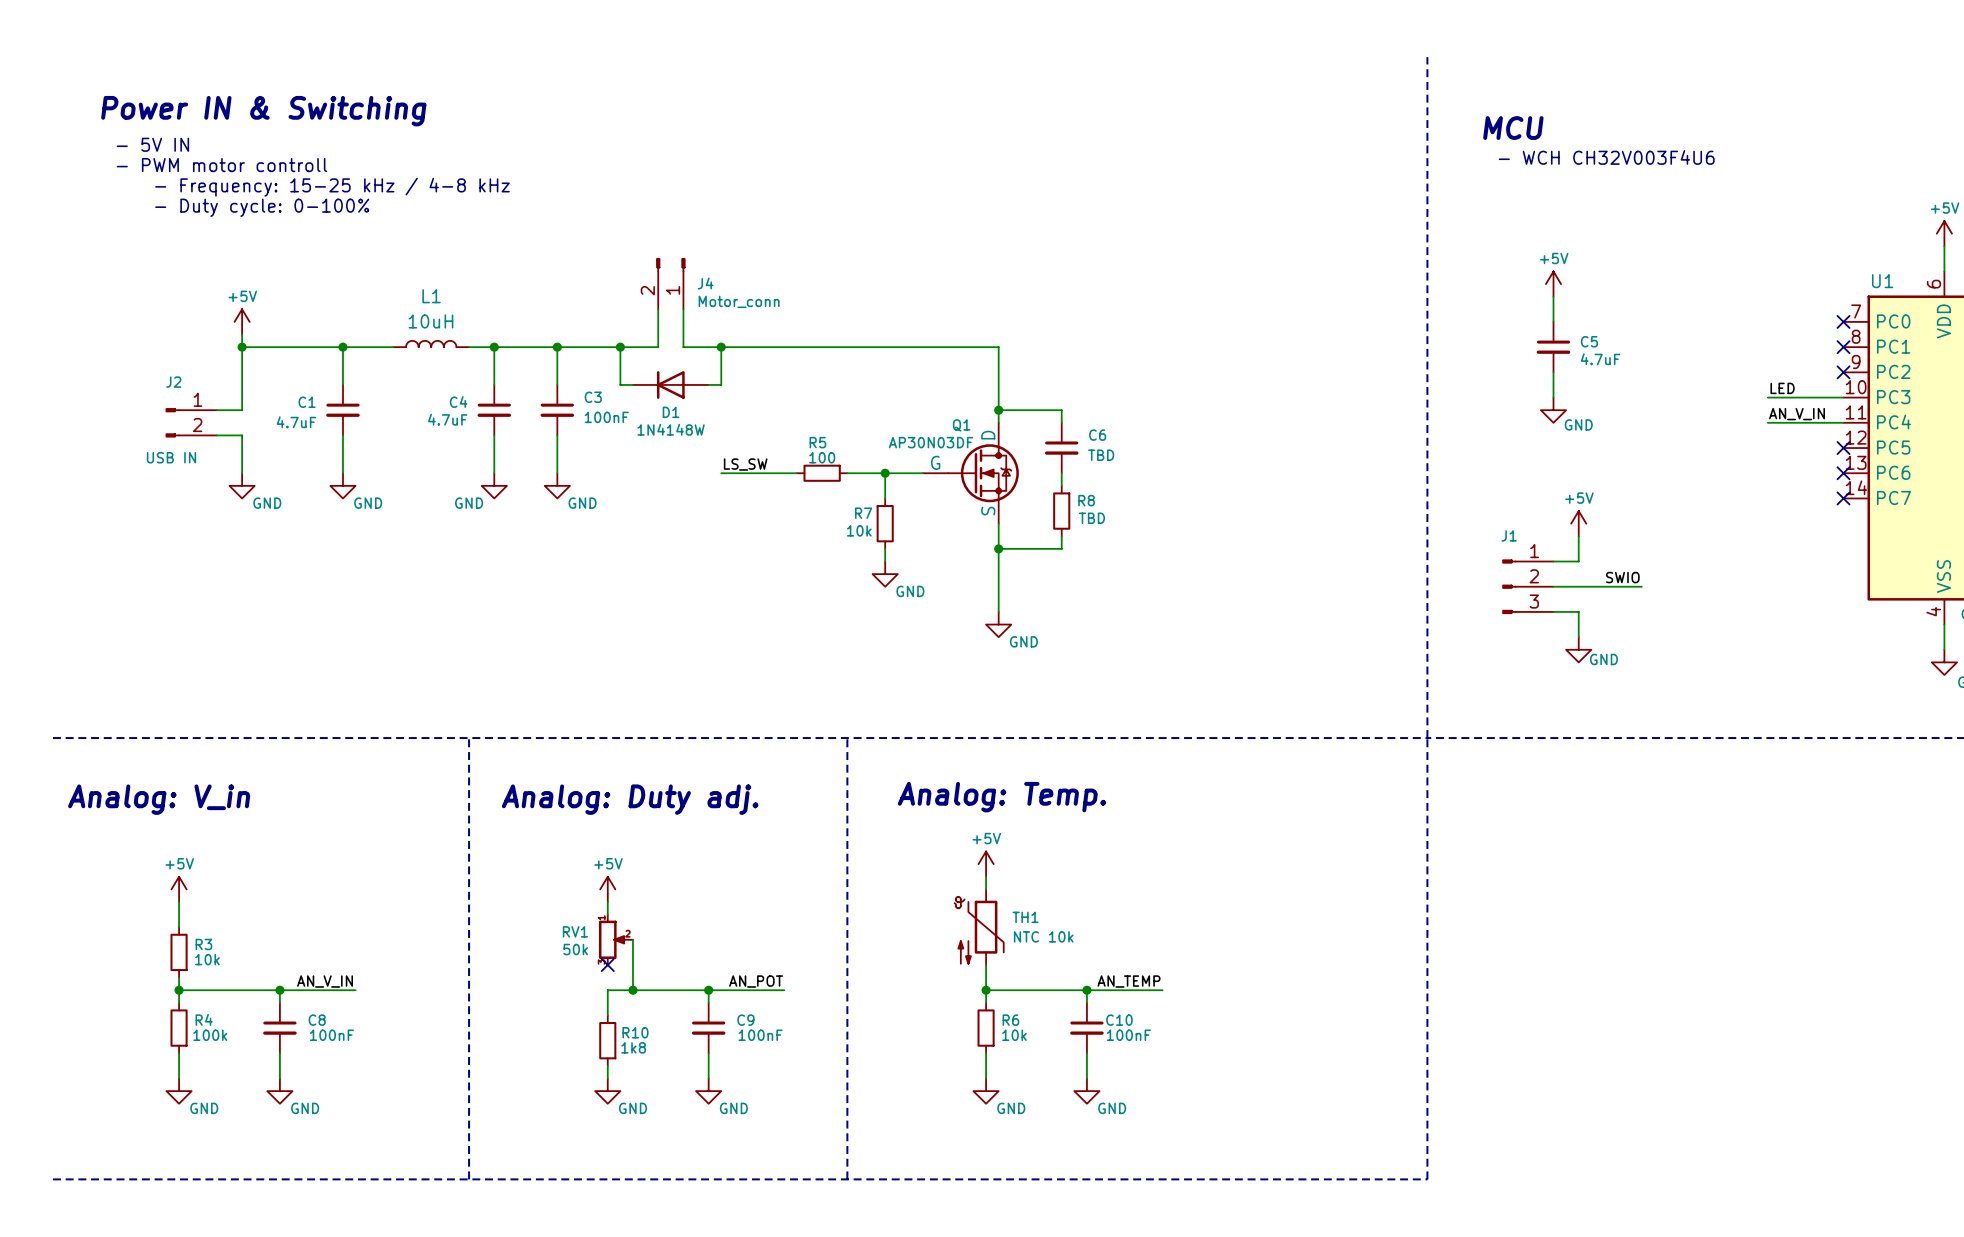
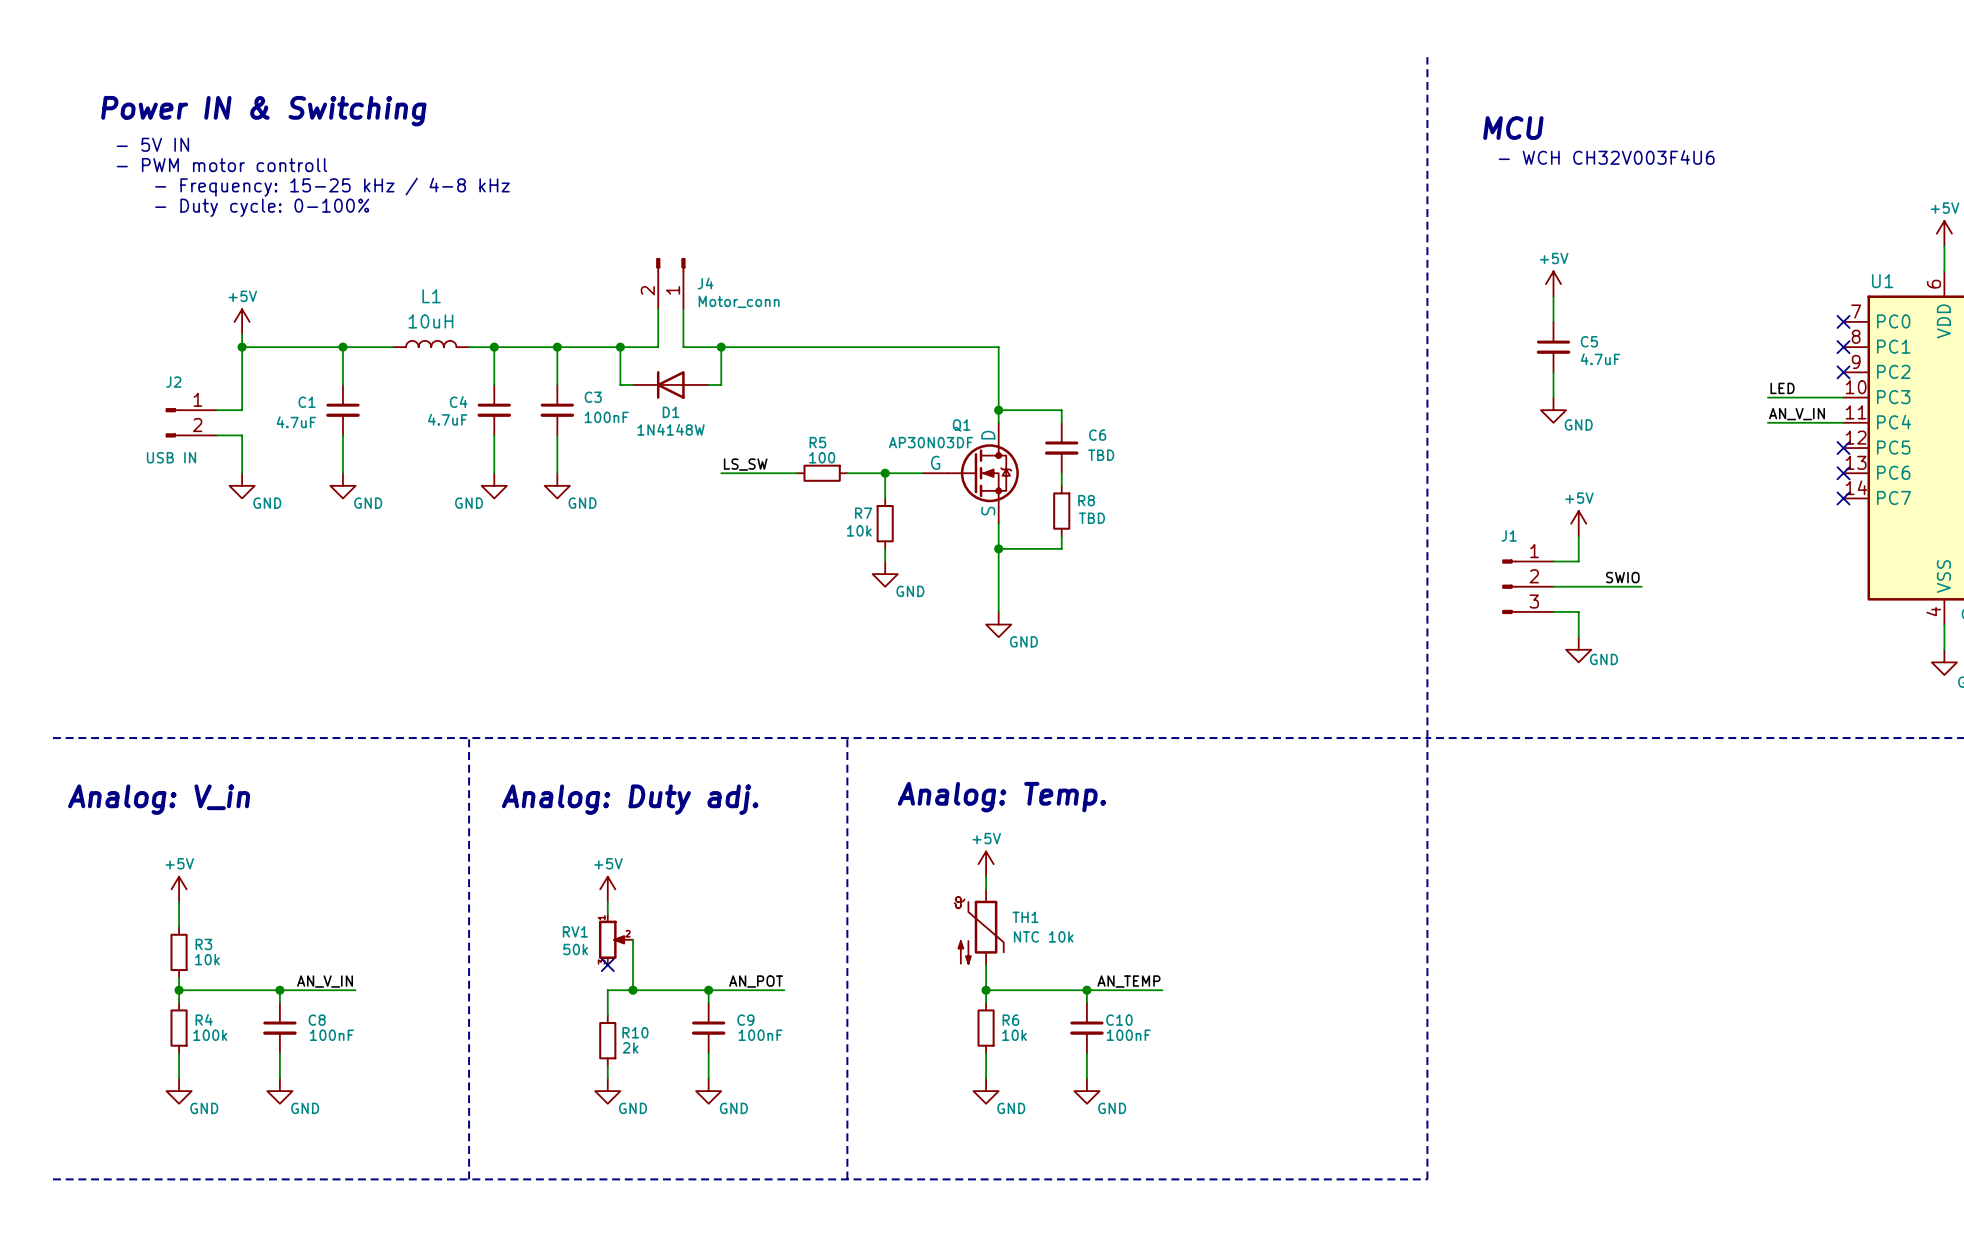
R10 value: 1k8 (633, 1047) -> 2k (630, 1047)

